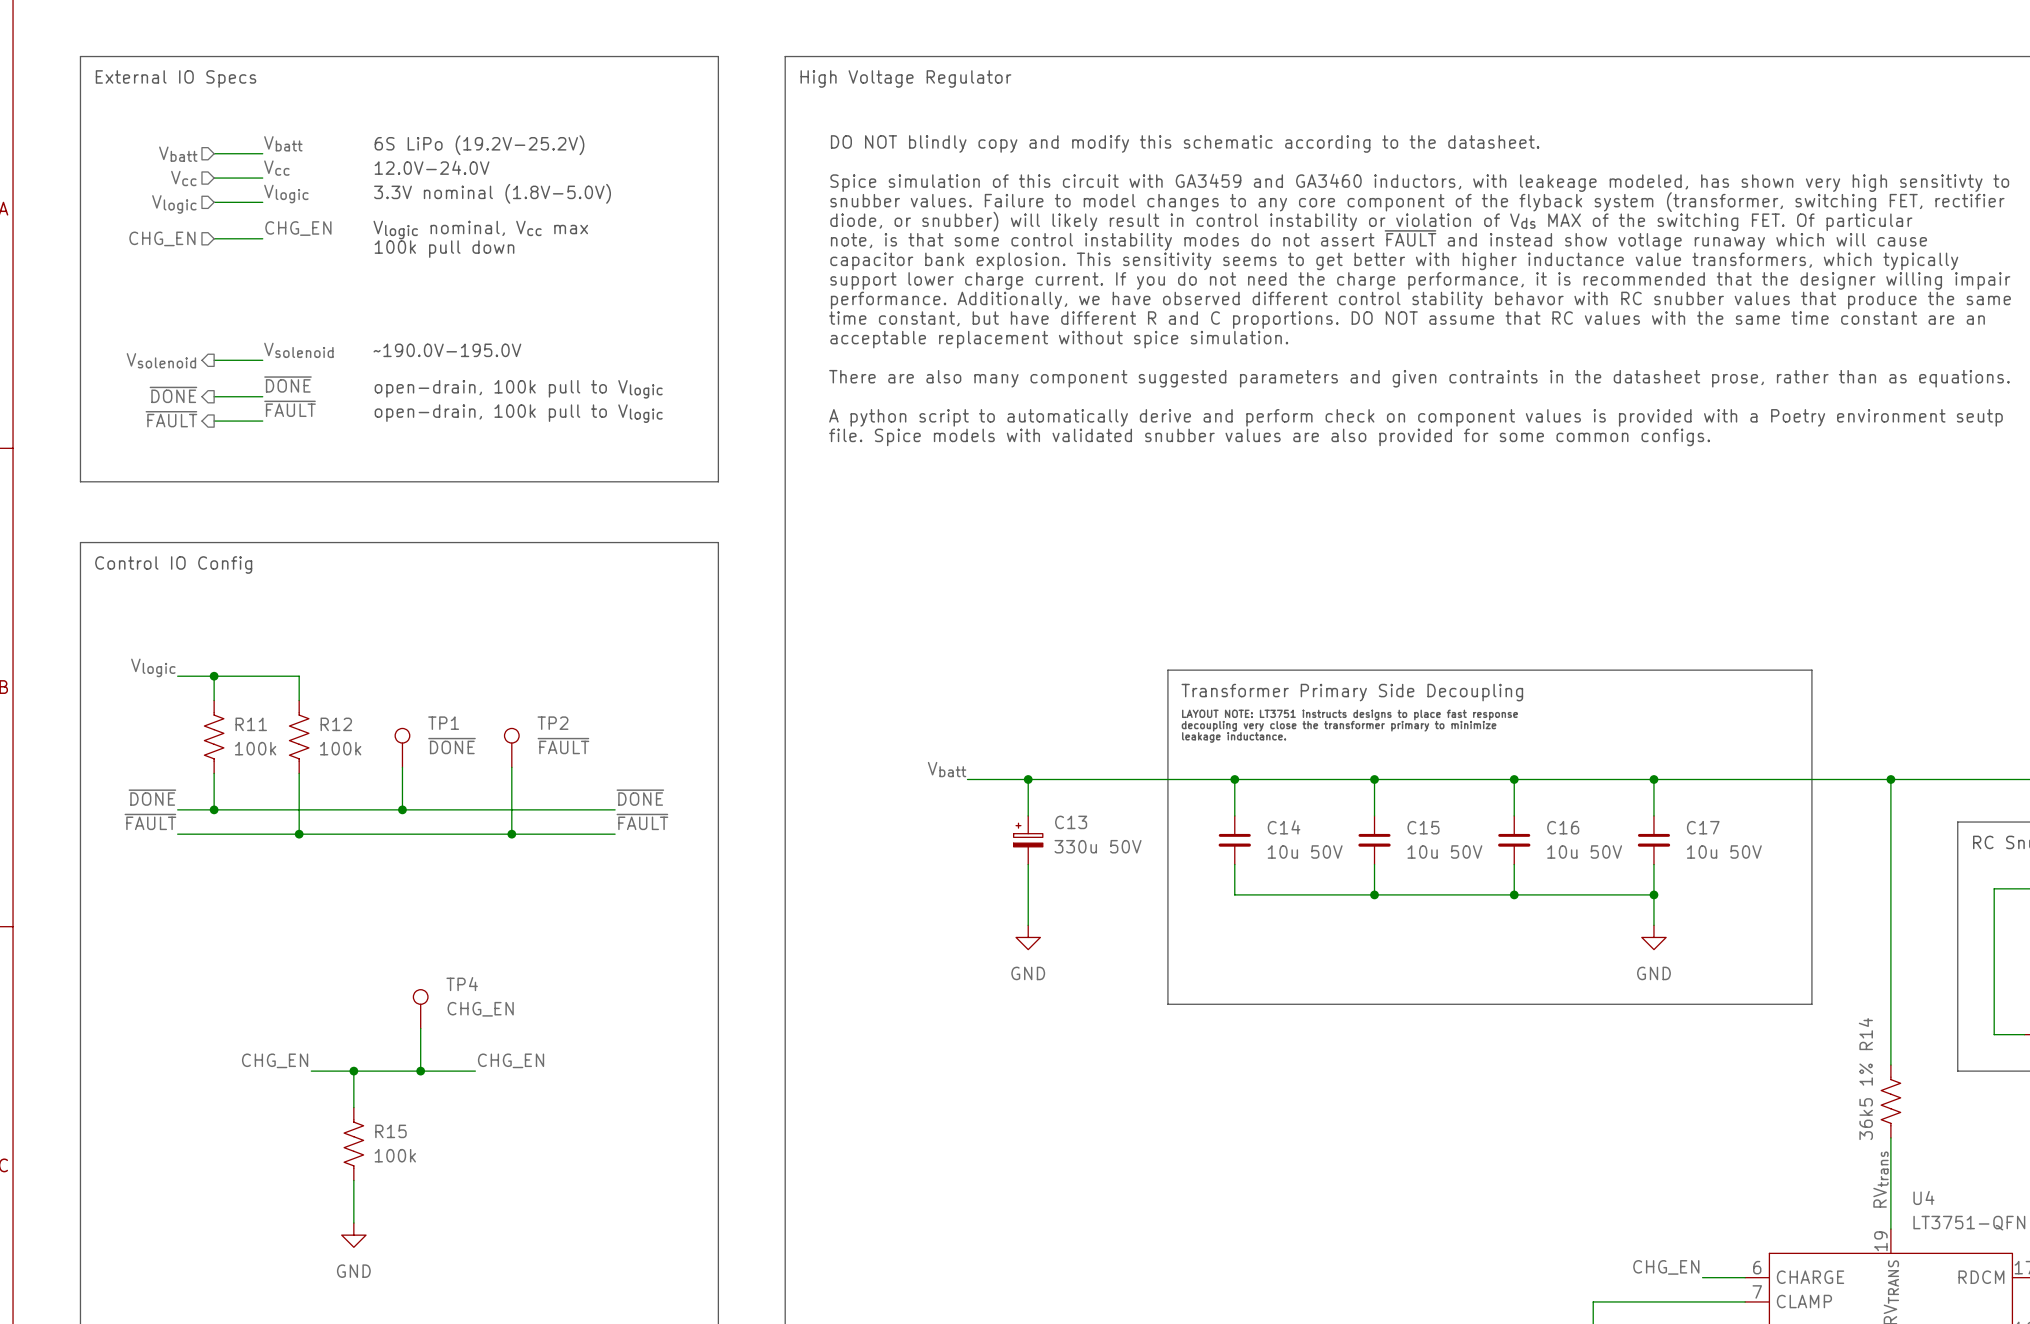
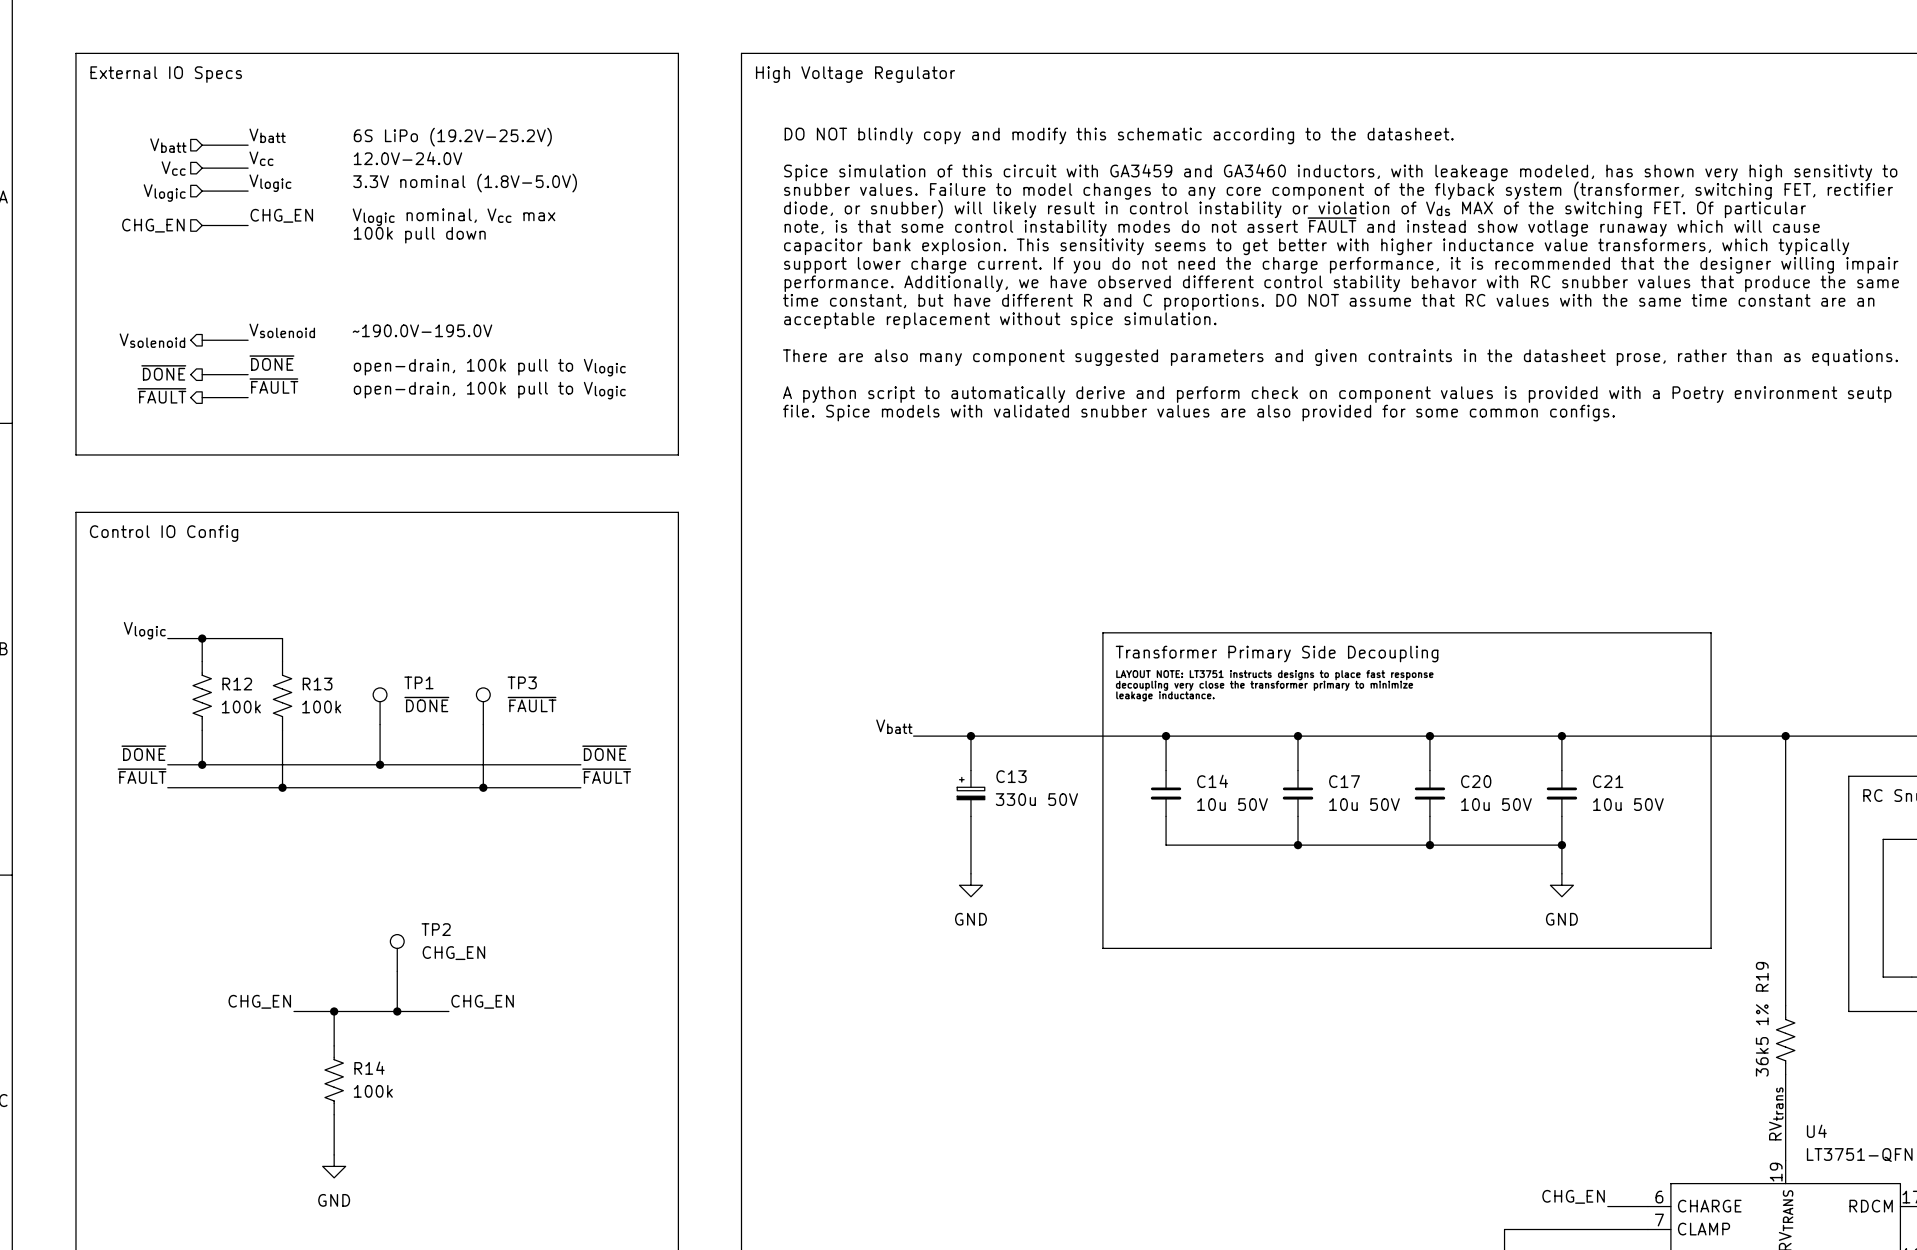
TP2 name: TP2 (552, 723) -> TP3 (522, 682)
R11 name: R11 (251, 724) -> R12 (237, 684)
R12 name: R12 (336, 724) -> R13 (317, 684)
C15 name: C15 (1423, 827) -> C17 (1344, 781)
C16 name: C16 (1563, 827) -> C20 (1476, 781)
C17 name: C17 (1703, 827) -> C21 (1608, 781)
TP4 name: TP4 (462, 984) -> TP2 (436, 929)
R14 name: R14 (1865, 1034) -> R19 (1762, 976)
R15 name: R15 (390, 1131) -> R14 (369, 1068)

